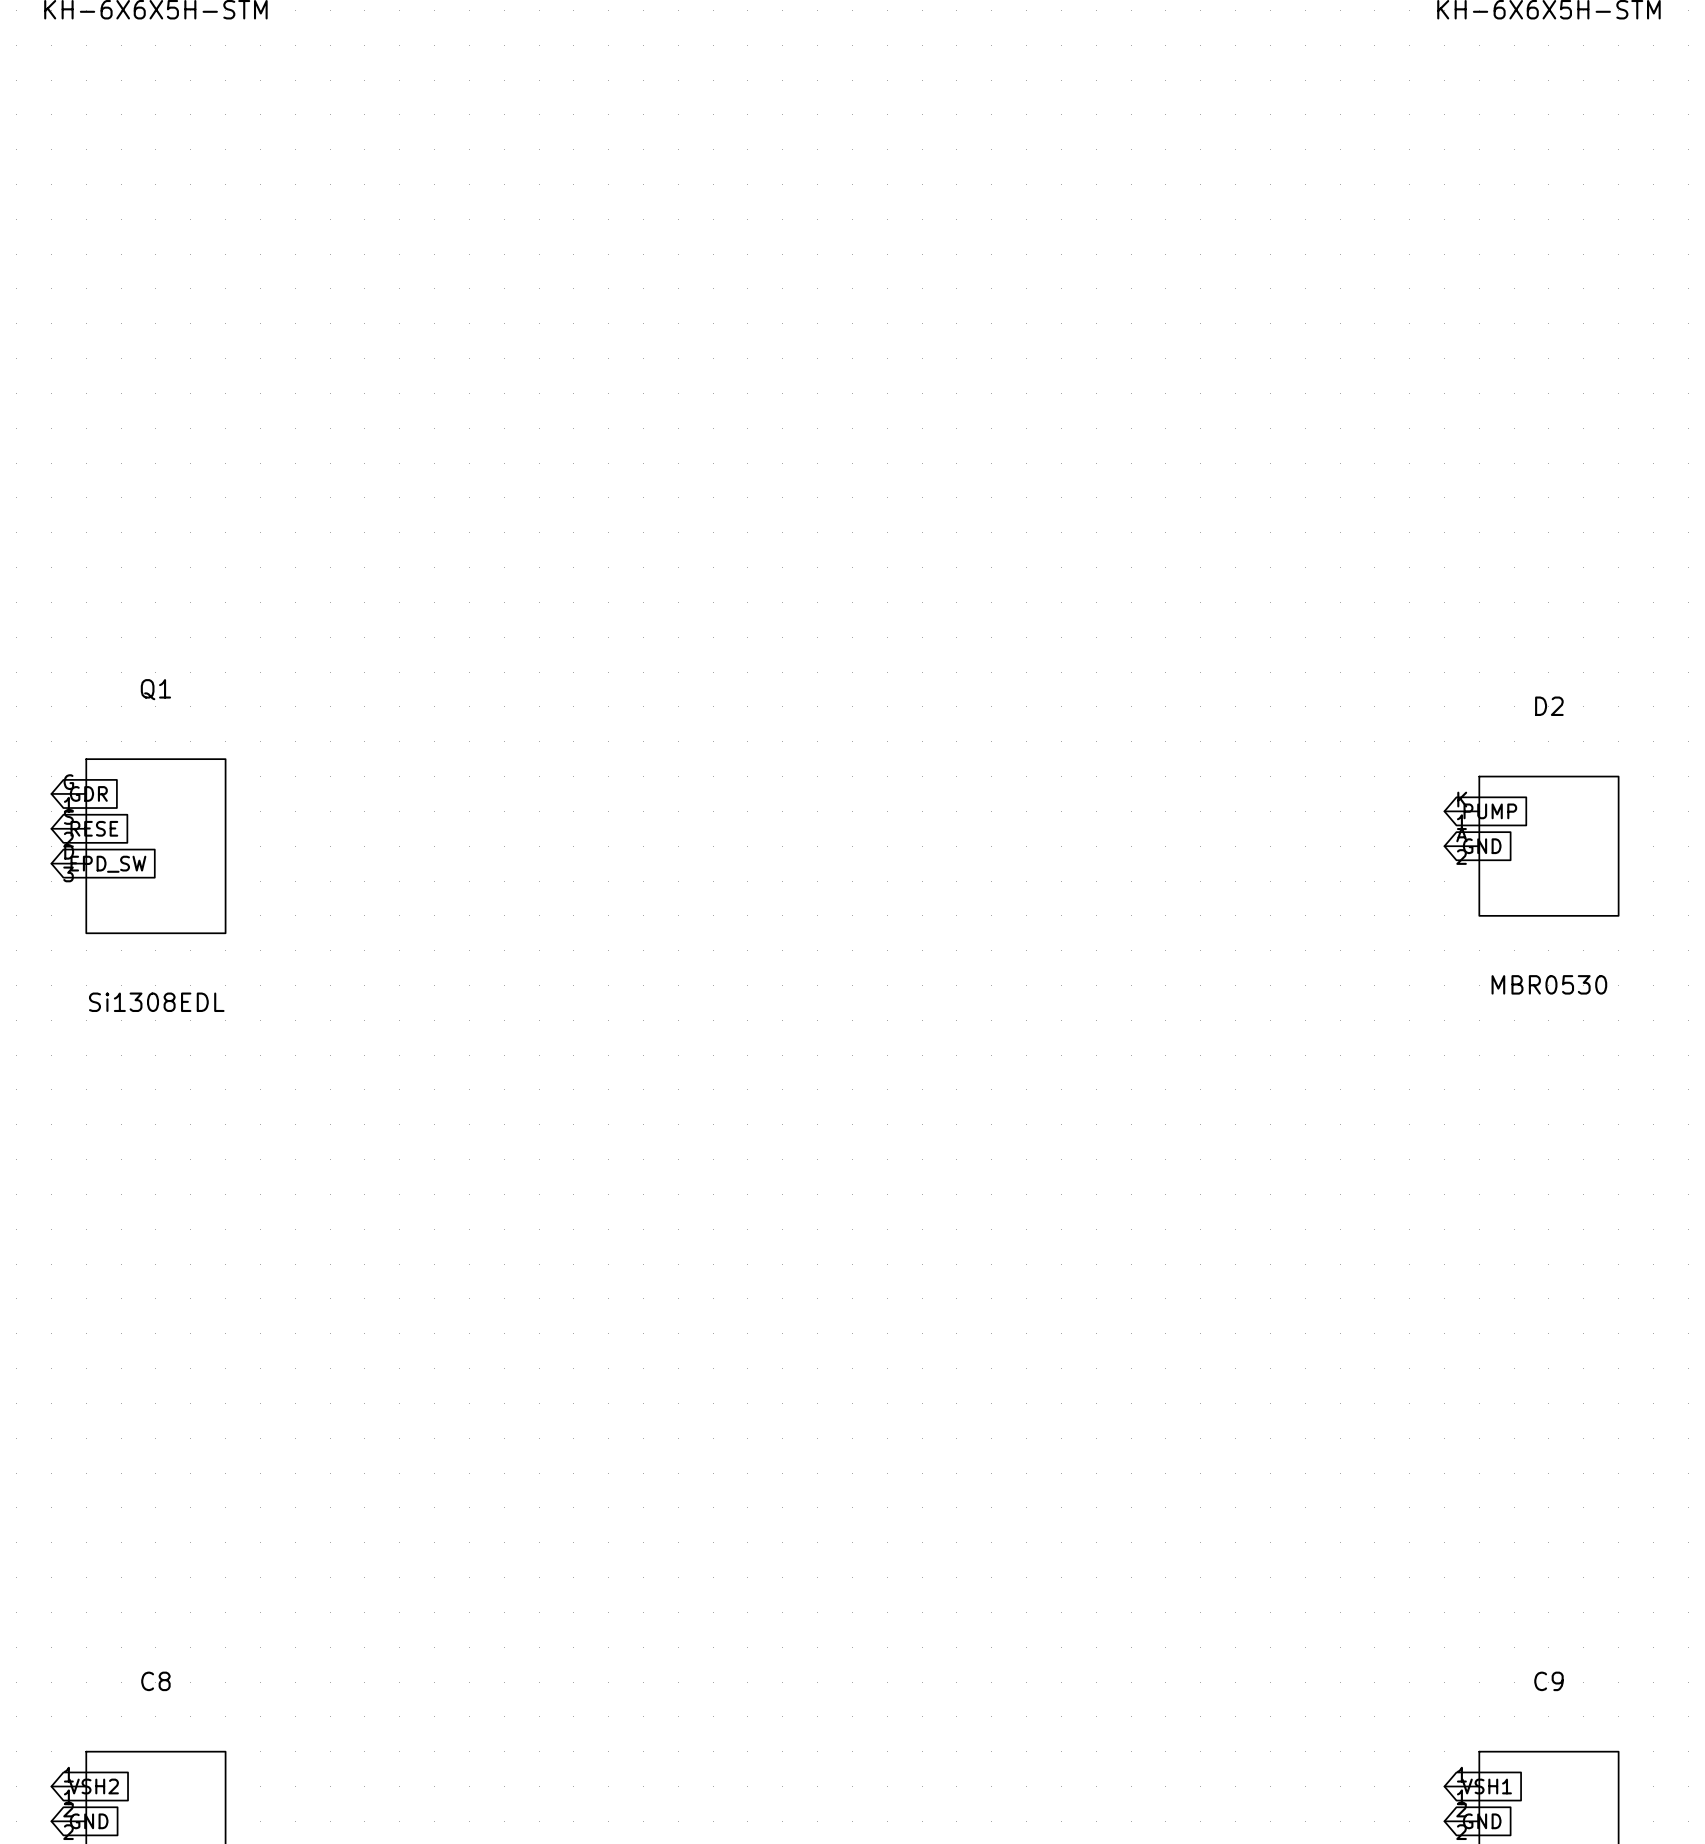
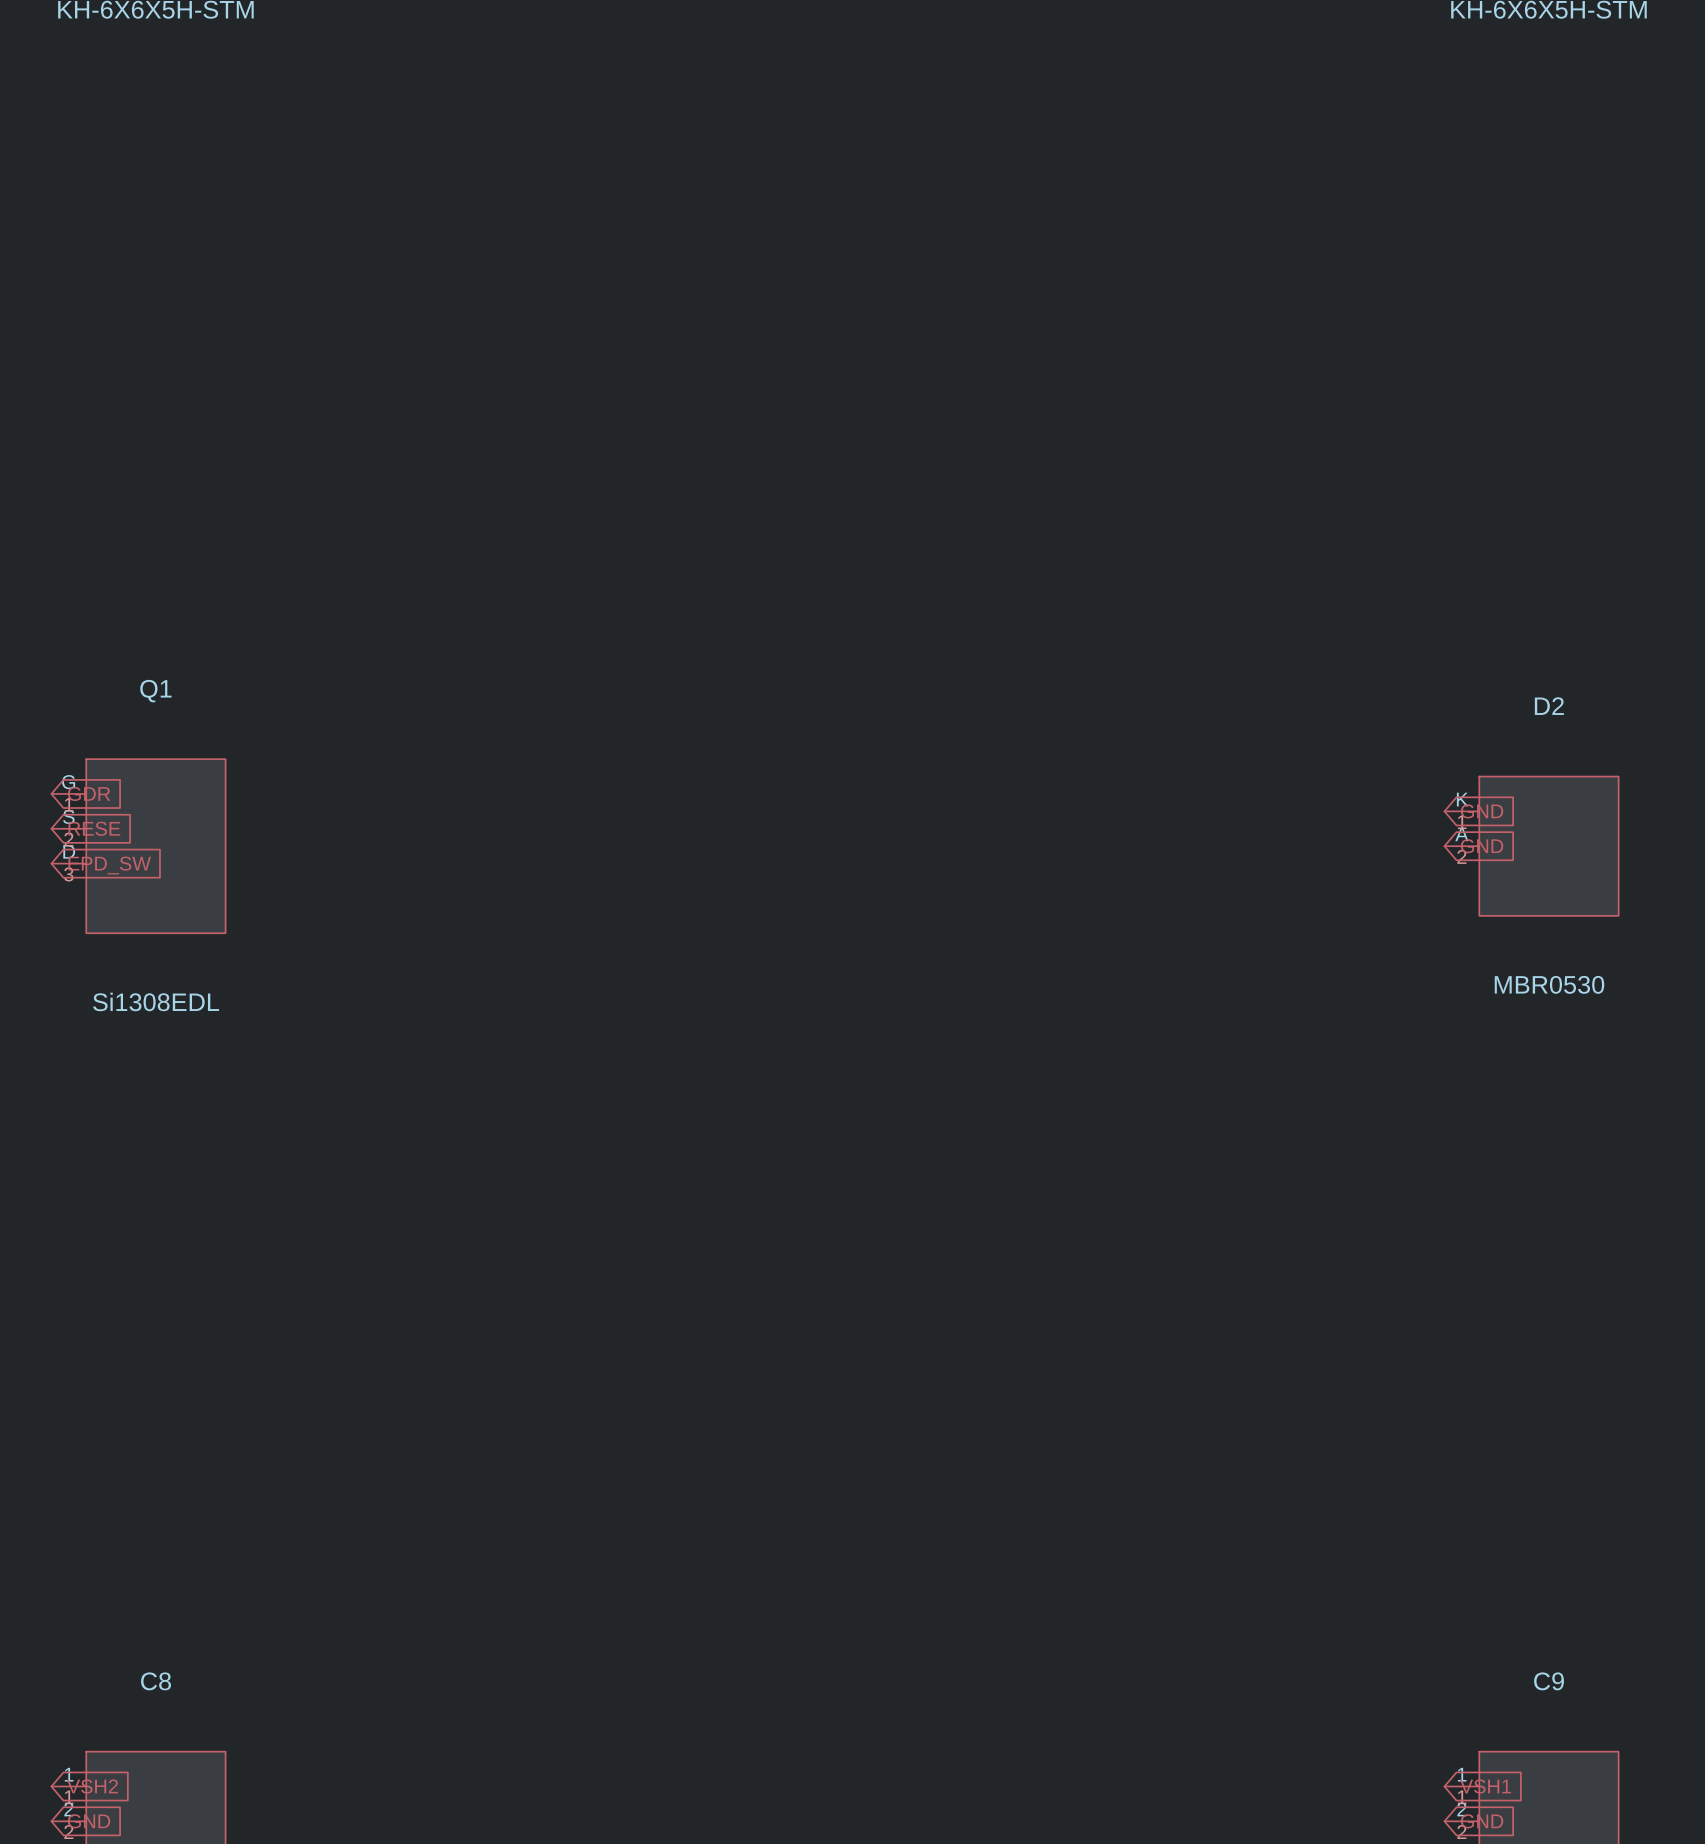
global label: PUMP (1490, 811) -> GND (1482, 811)

